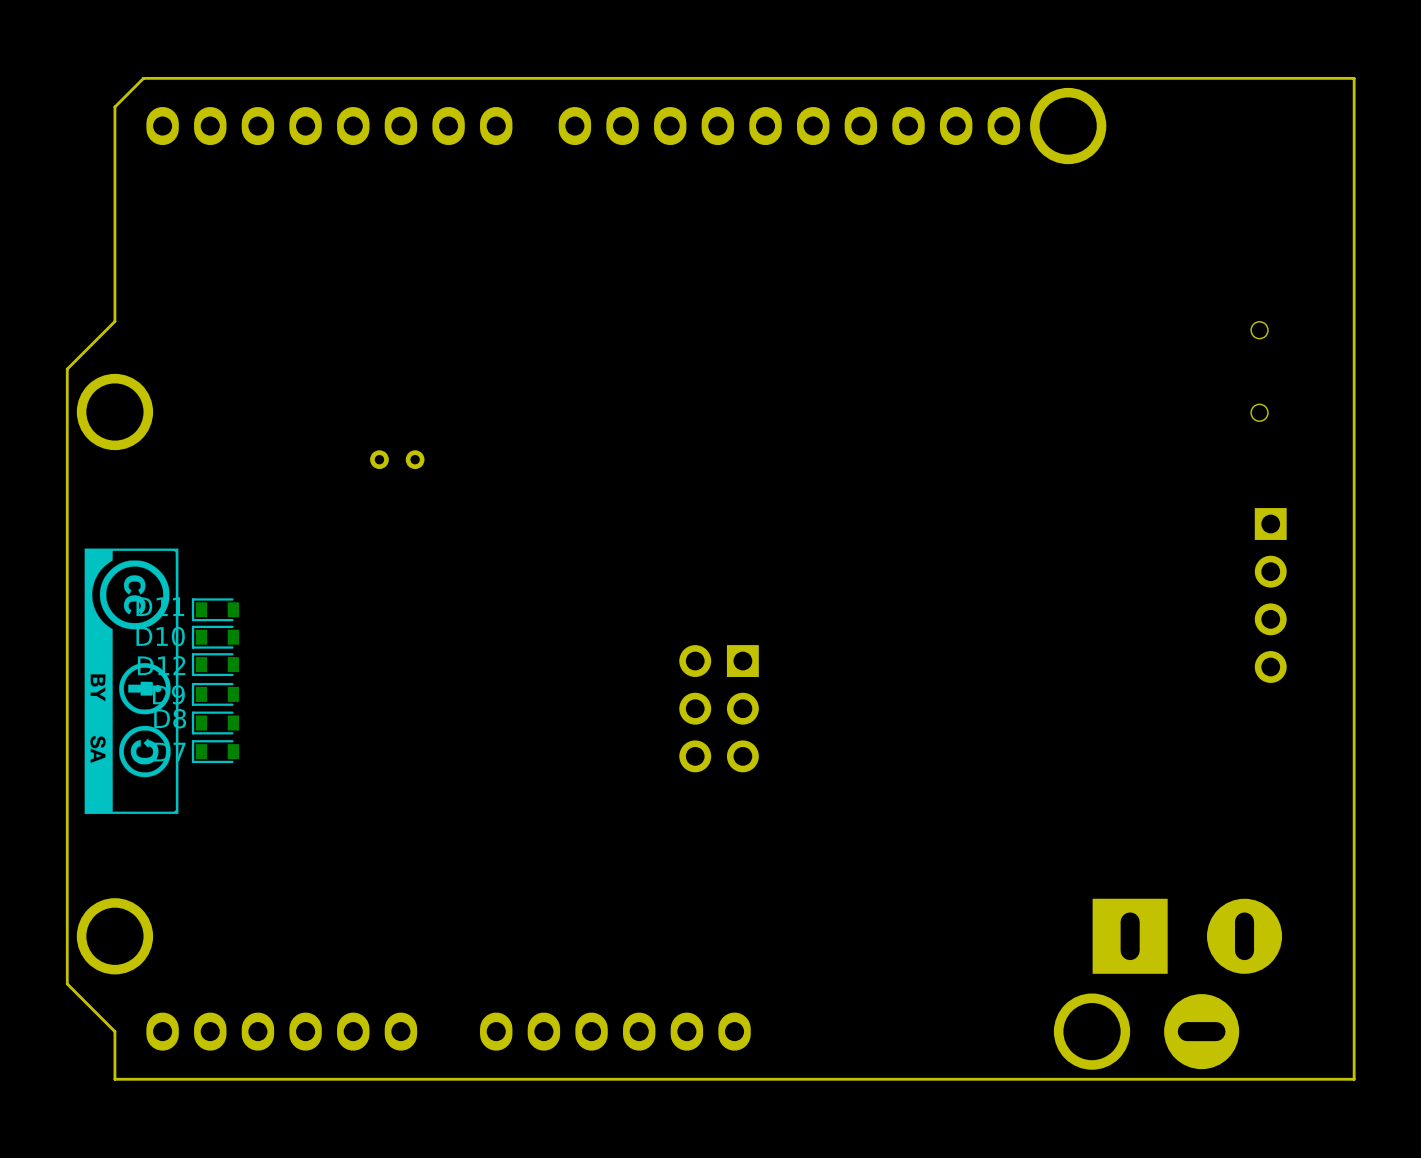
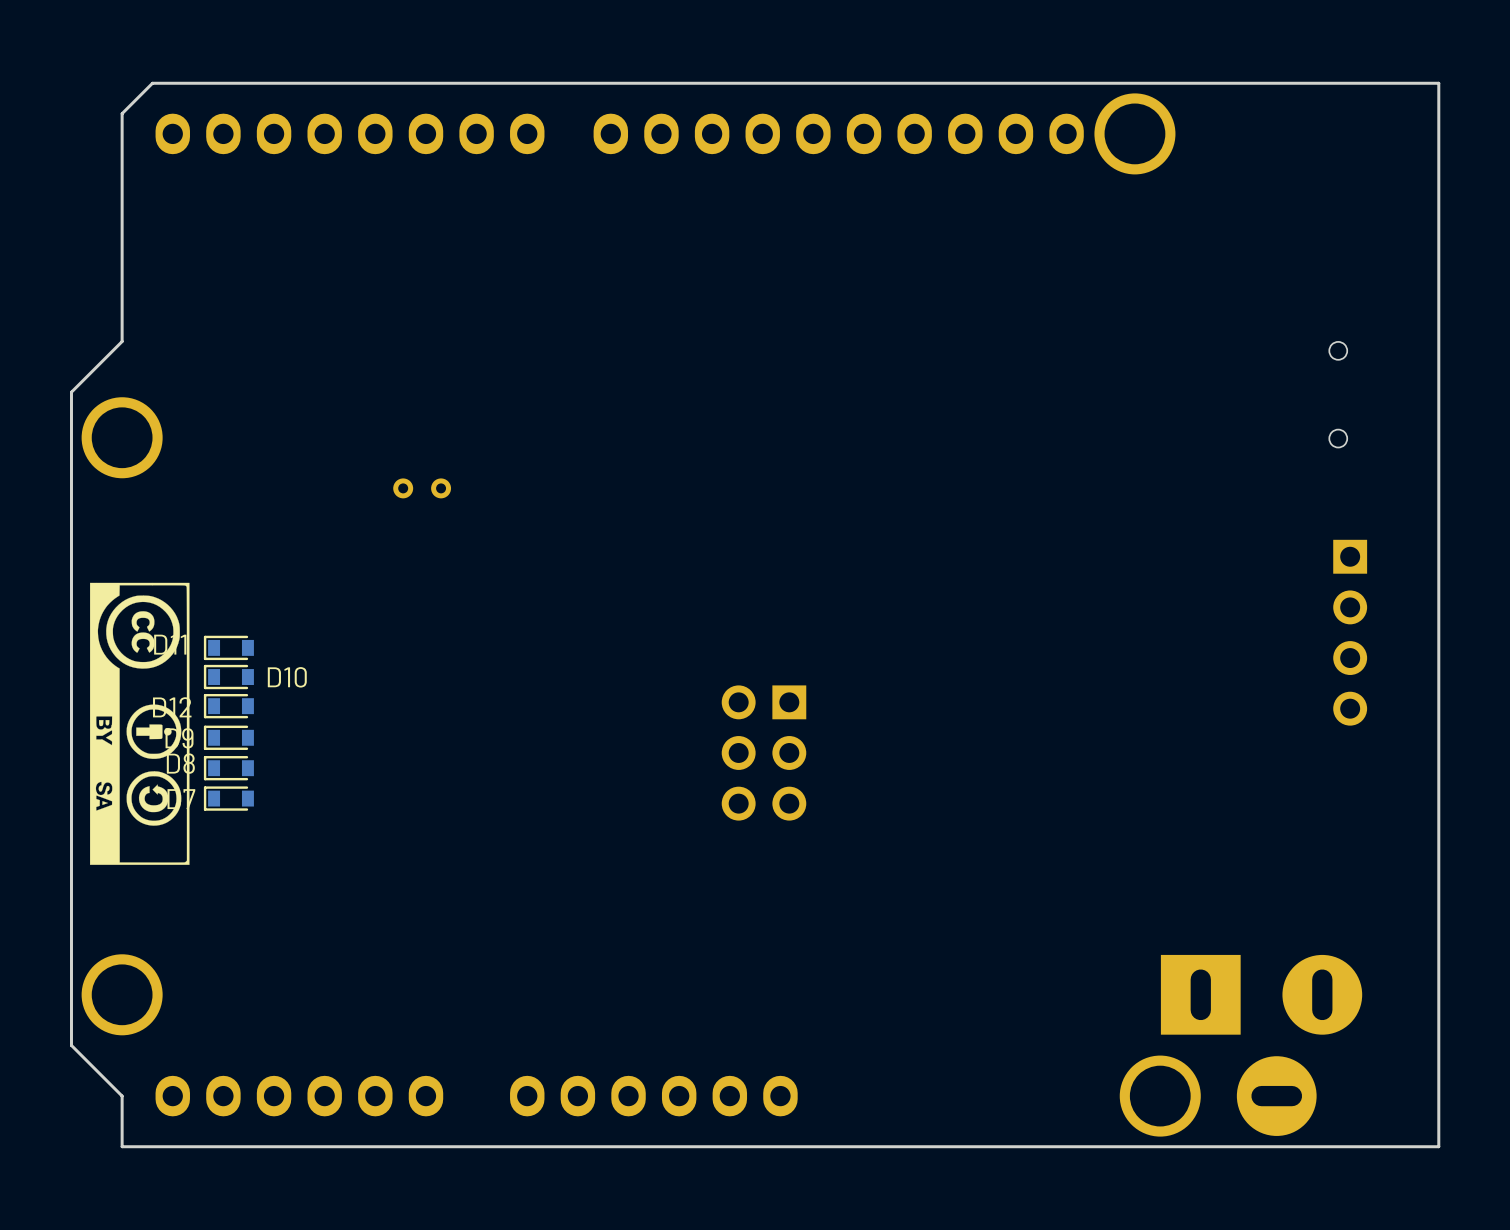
D10 name position: D10 (160, 636) -> D10 (287, 677)

